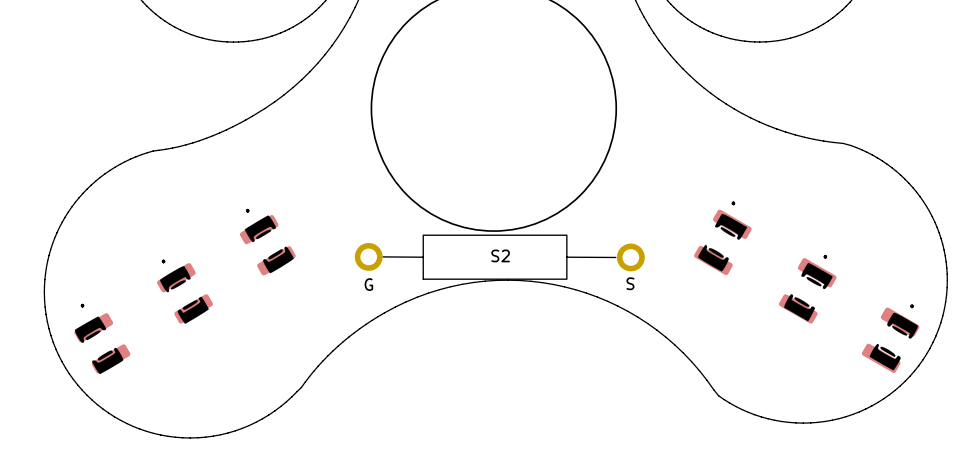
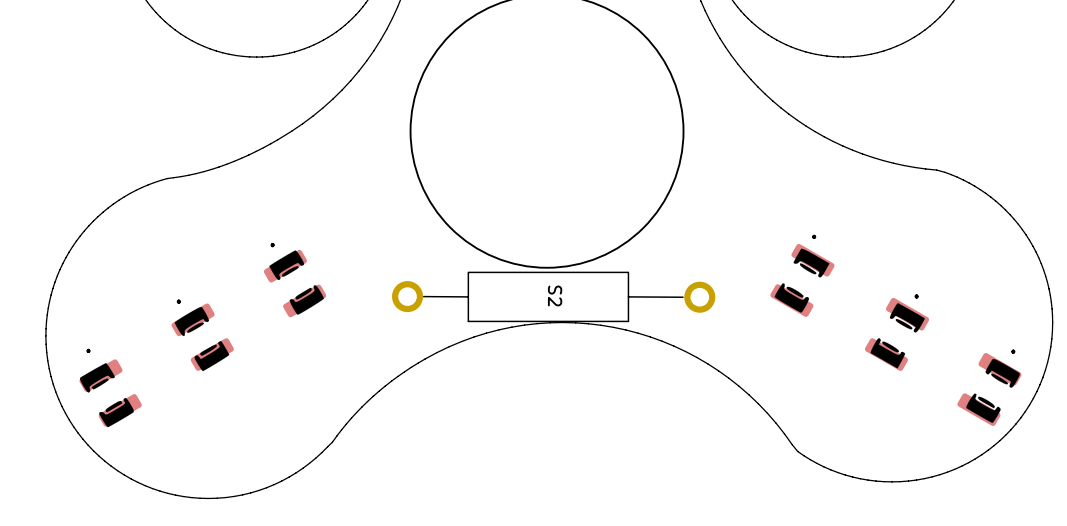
S2 name rotation: 0° (500, 255) -> 90° clockwise (555, 295)
text: S (630, 283) -> none
text: G (368, 284) -> none

